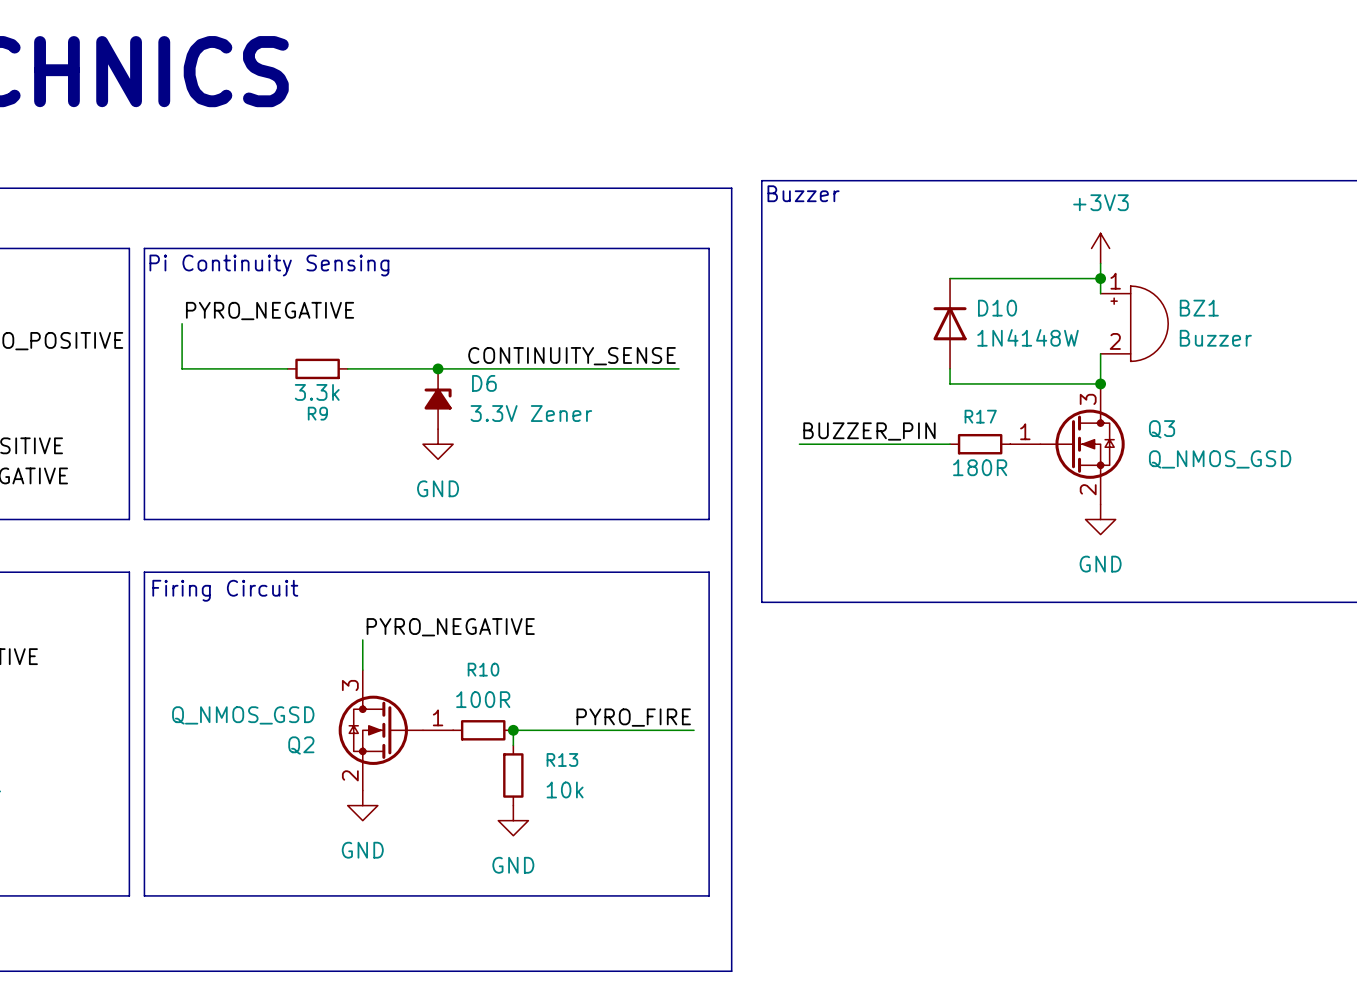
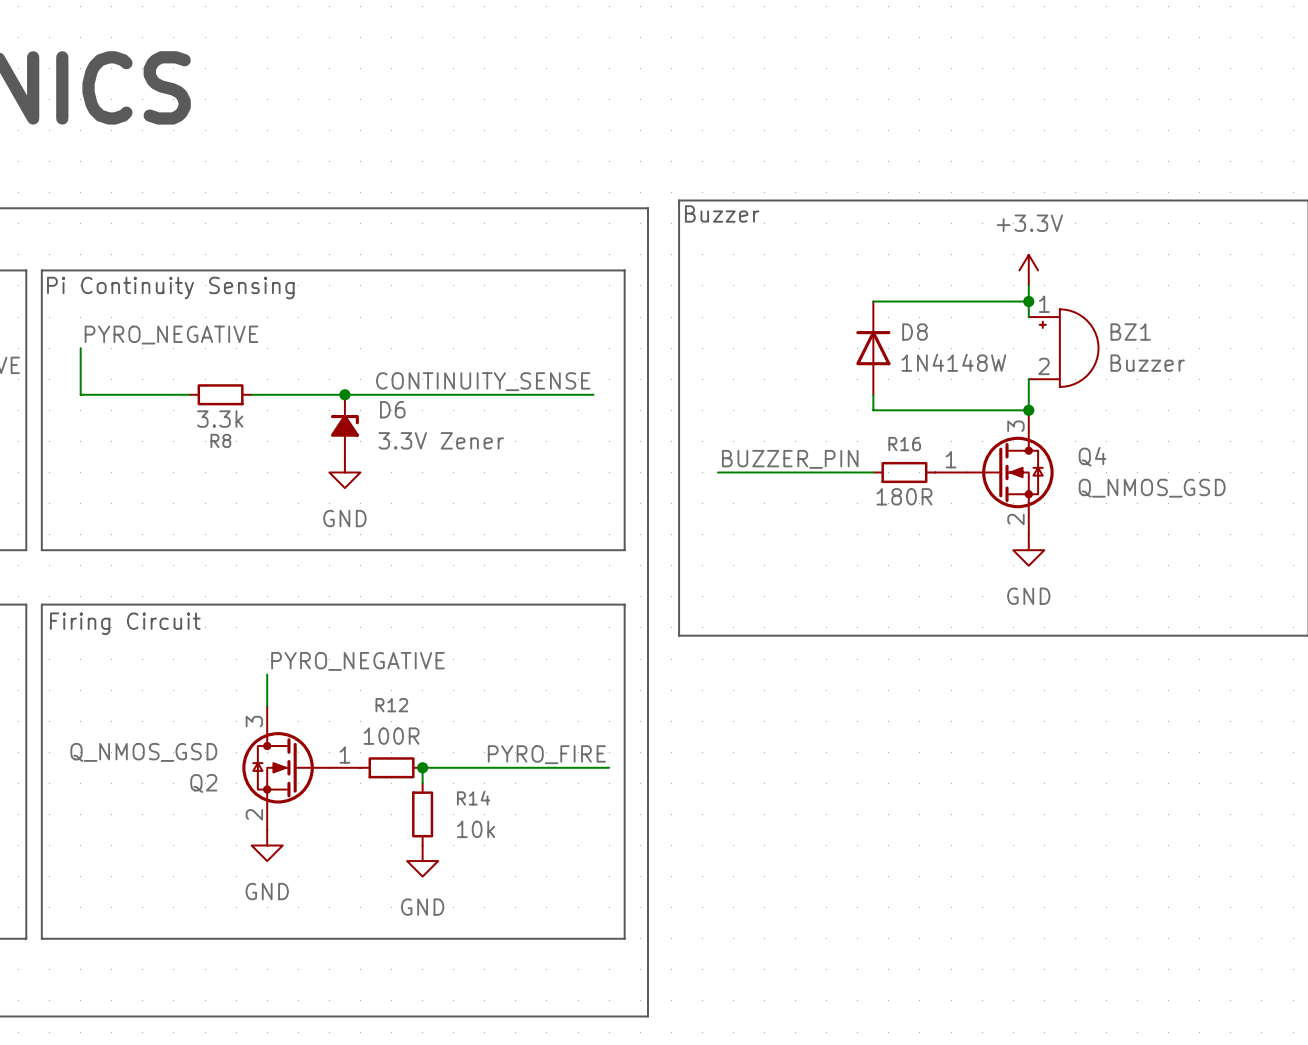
power symbol: +3V3 (1100, 248) -> +3.3V (1028, 270)
D10 name: D10 (997, 308) -> D8 (914, 332)
R9 name: R9 (317, 413) -> R8 (220, 440)
R17 name: R17 (980, 416) -> R16 (904, 444)
Q3 name: Q3 (1162, 429) -> Q4 (1092, 456)
R10 name: R10 (483, 669) -> R12 (391, 705)
R13 name: R13 (562, 759) -> R14 (473, 798)

